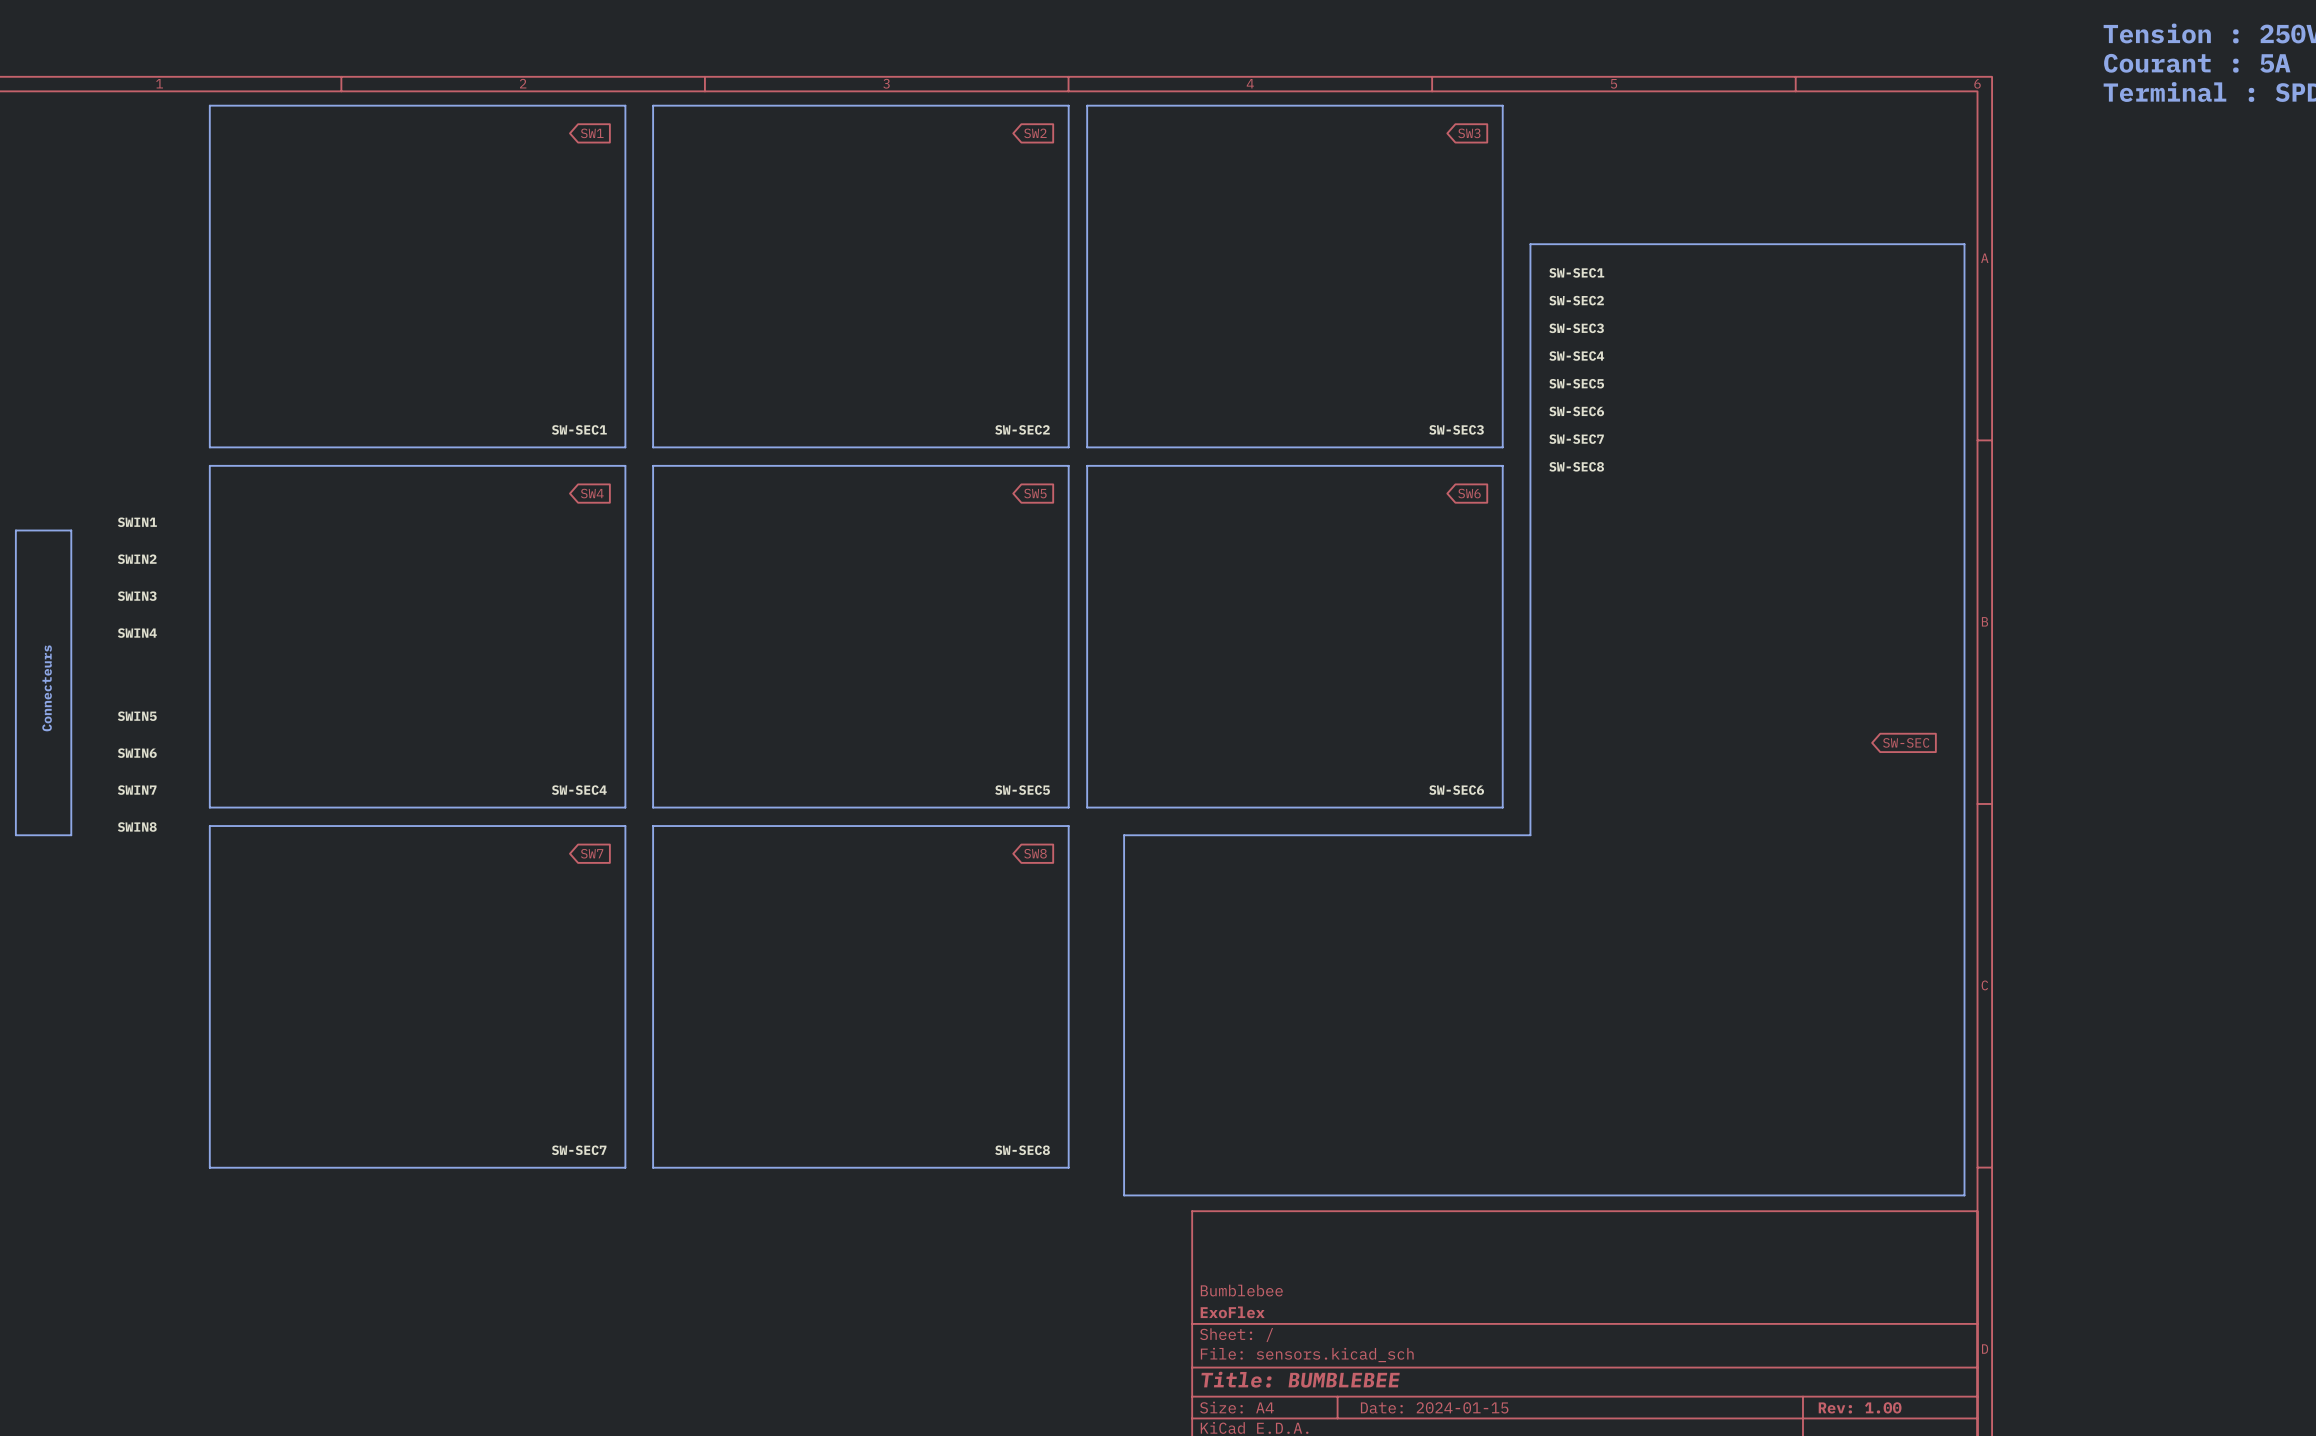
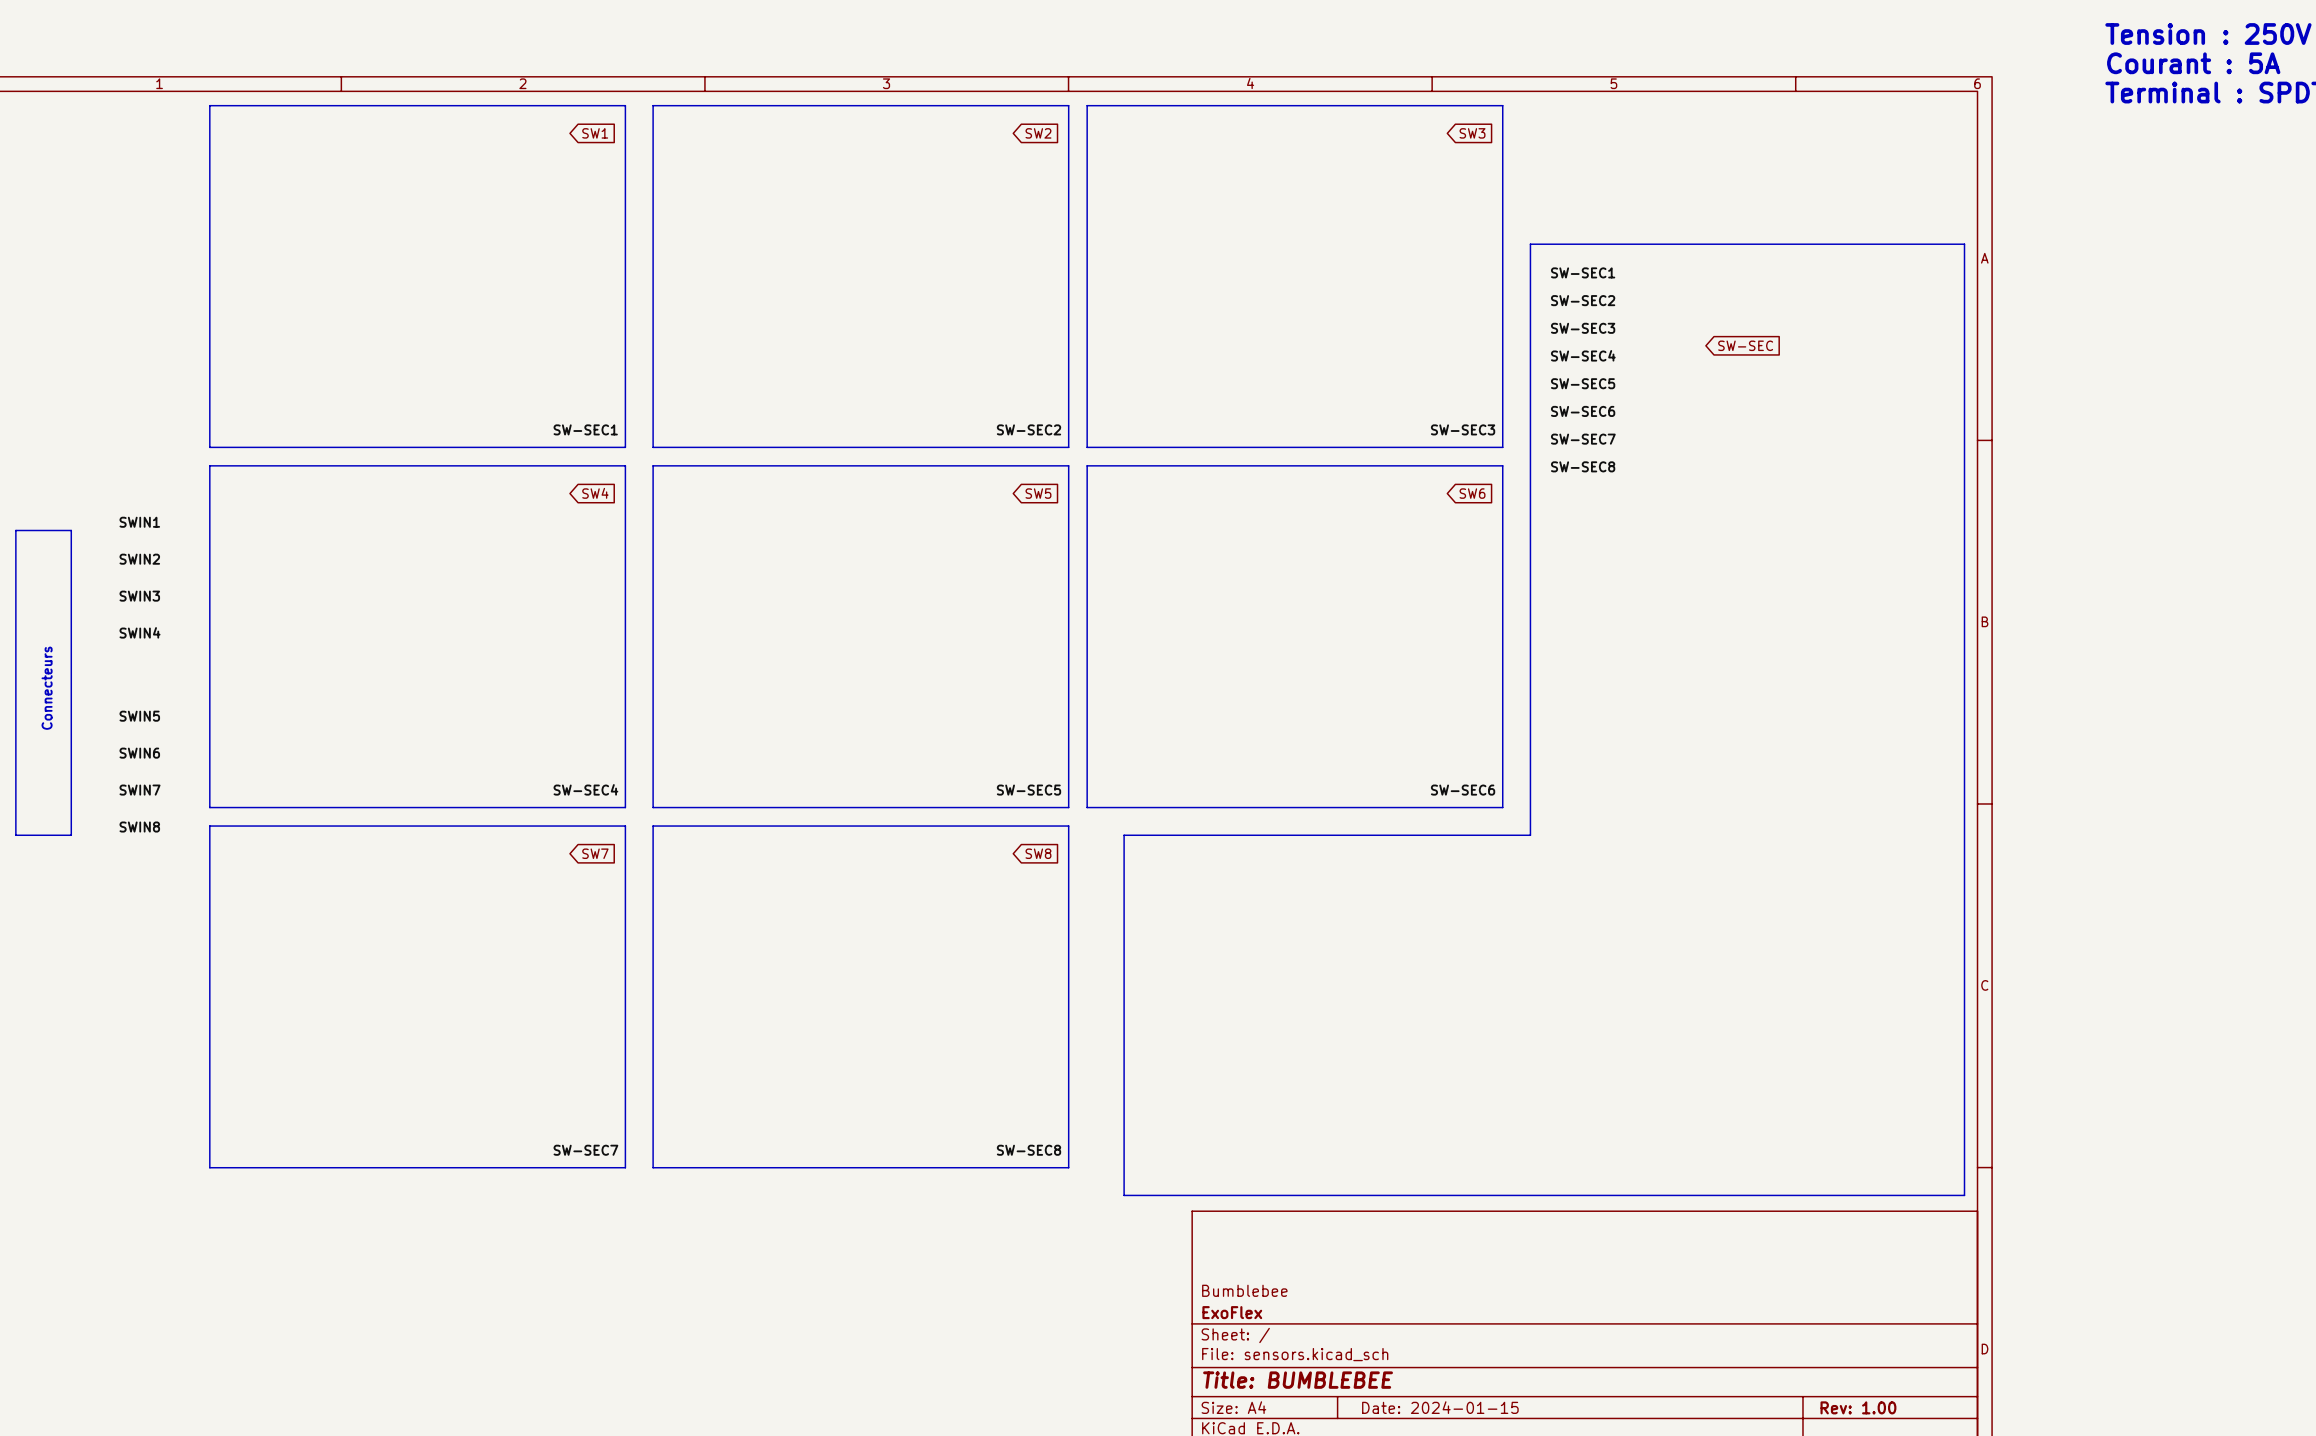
global label: none -> SW-SEC (1745, 345)
global label: SW-SEC (1906, 742) -> none

